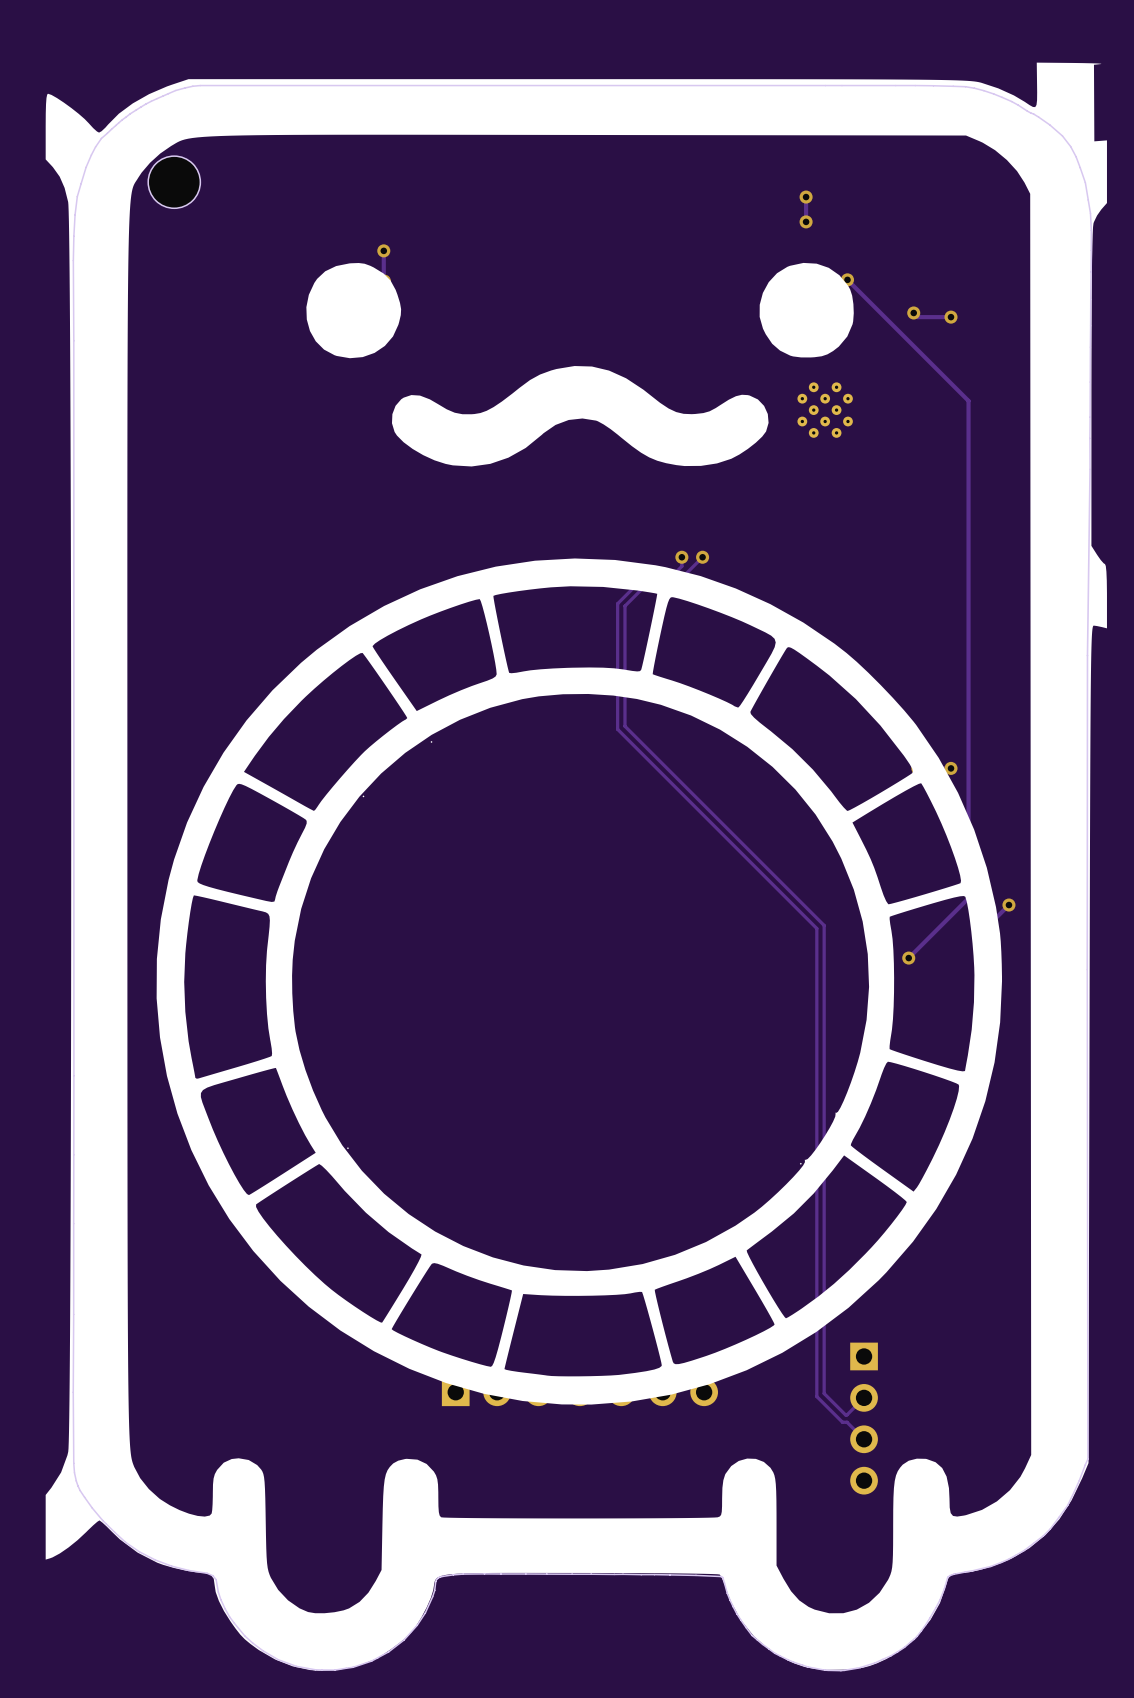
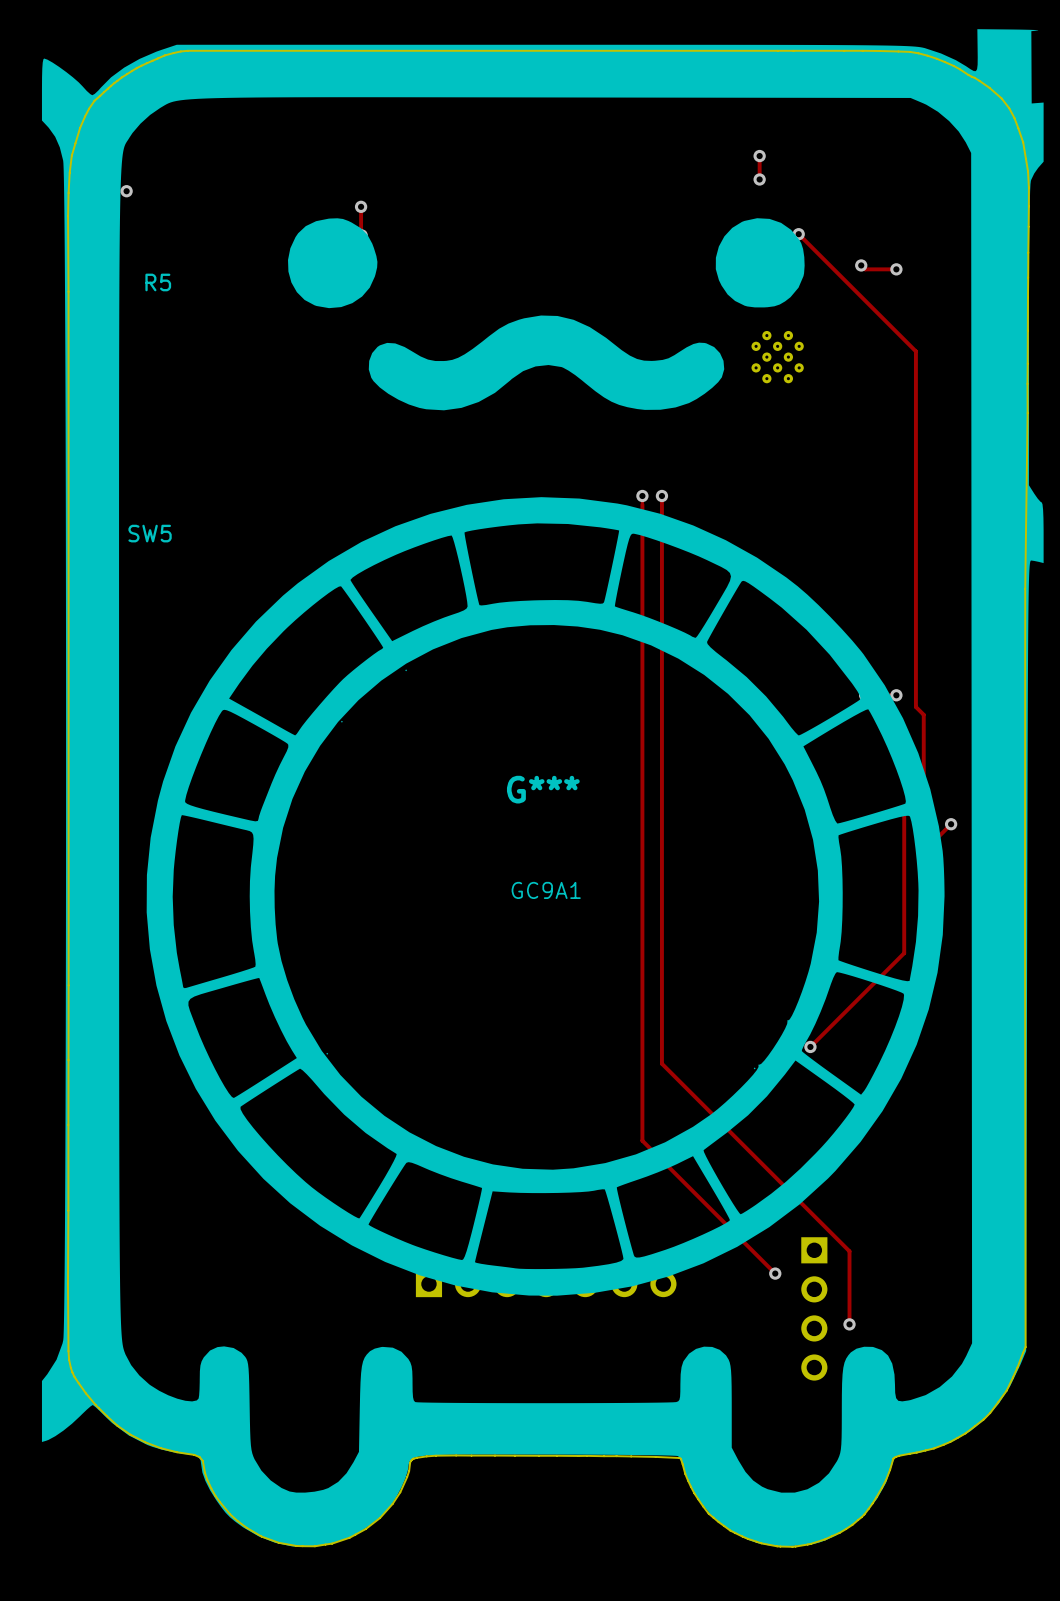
drawing: [45, 62, 1107, 1671] -> none
part: (174, 182) -> none
via: none -> (126, 191)
R5: none -> (158, 282)
track: (968, 400) (968, 898) (908, 958) -> (912, 348) (915, 351) (915, 707) (923, 714) (923, 792) (904, 812) (904, 953) (810, 1046)
track: (702, 557) (676, 583) (647, 583) (624, 606) (624, 726) (824, 925) (824, 1393) (845, 1414) (864, 1397) -> (661, 495) (661, 1063) (849, 1251) (849, 1324)
track: (681, 566) (673, 574) (646, 574) (617, 603) (617, 729) (816, 928) (816, 1396) (842, 1422) (847, 1422) (864, 1439) -> (642, 504) (642, 1140) (775, 1273)
SW5: none -> (150, 533)
G***: none -> (542, 788)
via: (908, 958) -> none
GC9A1 name: none -> GC9A1 (546, 890)
via: none -> (810, 1046)
via: none -> (775, 1273)
via: none -> (849, 1324)

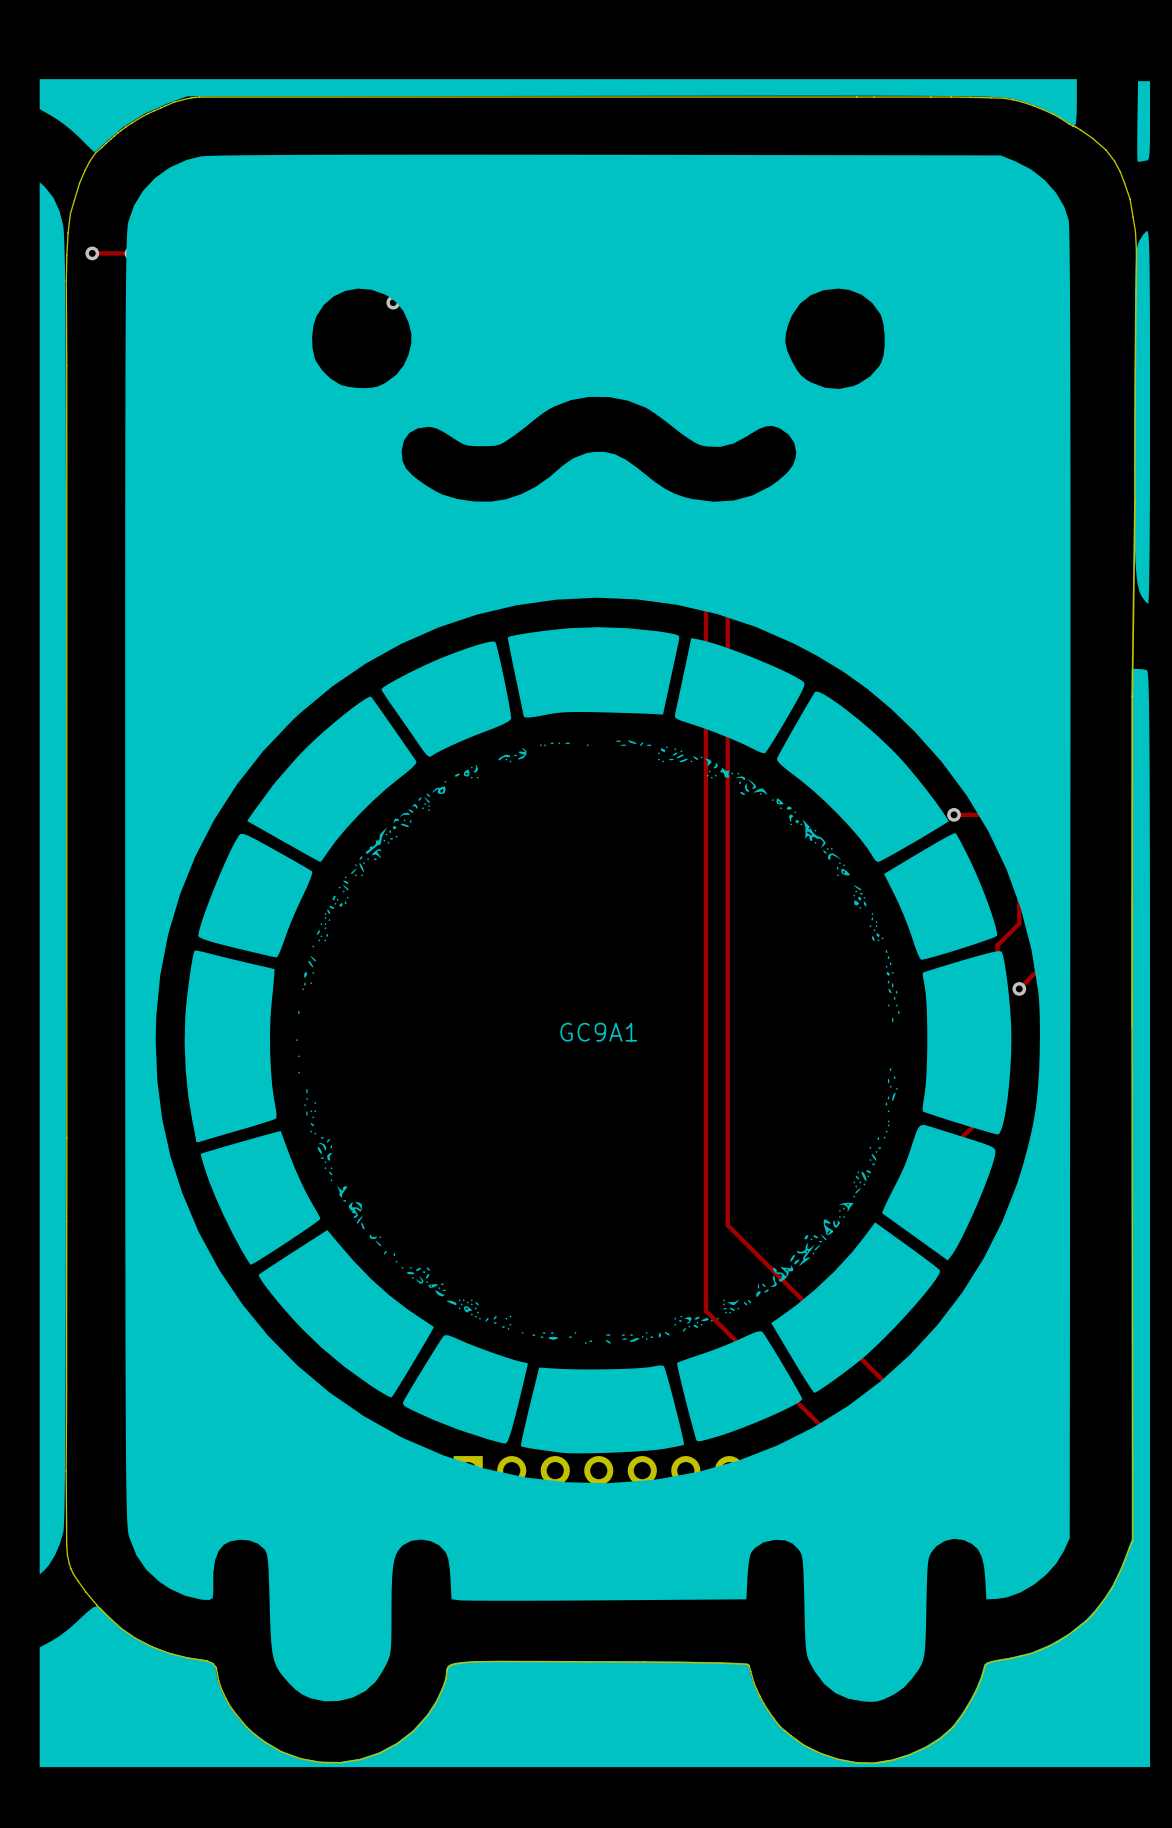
drawing: none -> [39, 79, 1151, 1768]
G***: (542, 788) -> none

